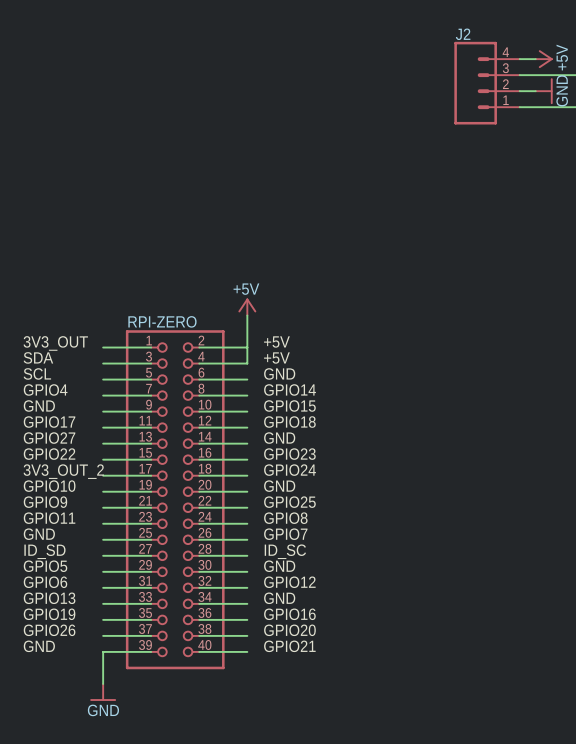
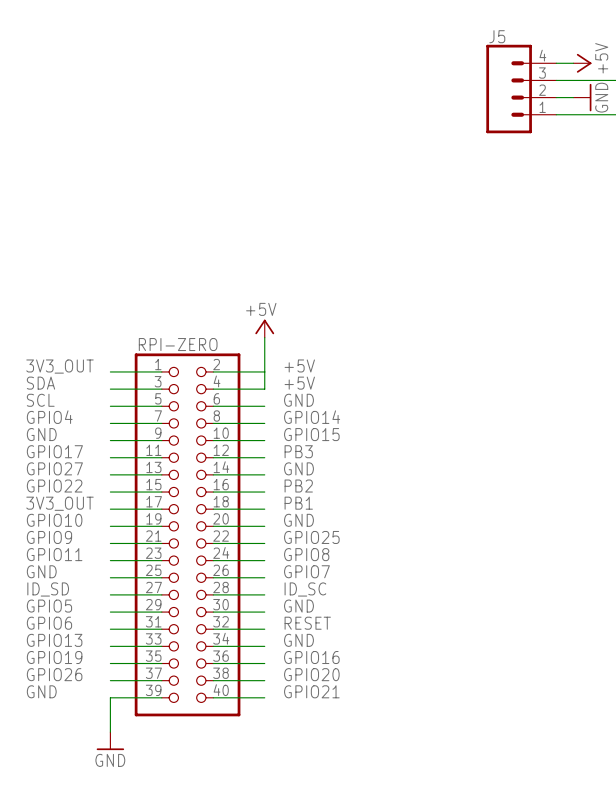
J2 name: J2 (463, 34) -> J5 (497, 36)
label: GPIO18 (289, 422) -> PB3 (298, 451)
label: GPIO23 (289, 454) -> PB2 (298, 486)
label: GPIO24 (290, 470) -> PB1 (298, 503)
label: 3V3_OUT_2 (63, 471) -> 3V3_OUT (60, 503)
label: GPIO12 (289, 582) -> RESET (307, 623)

